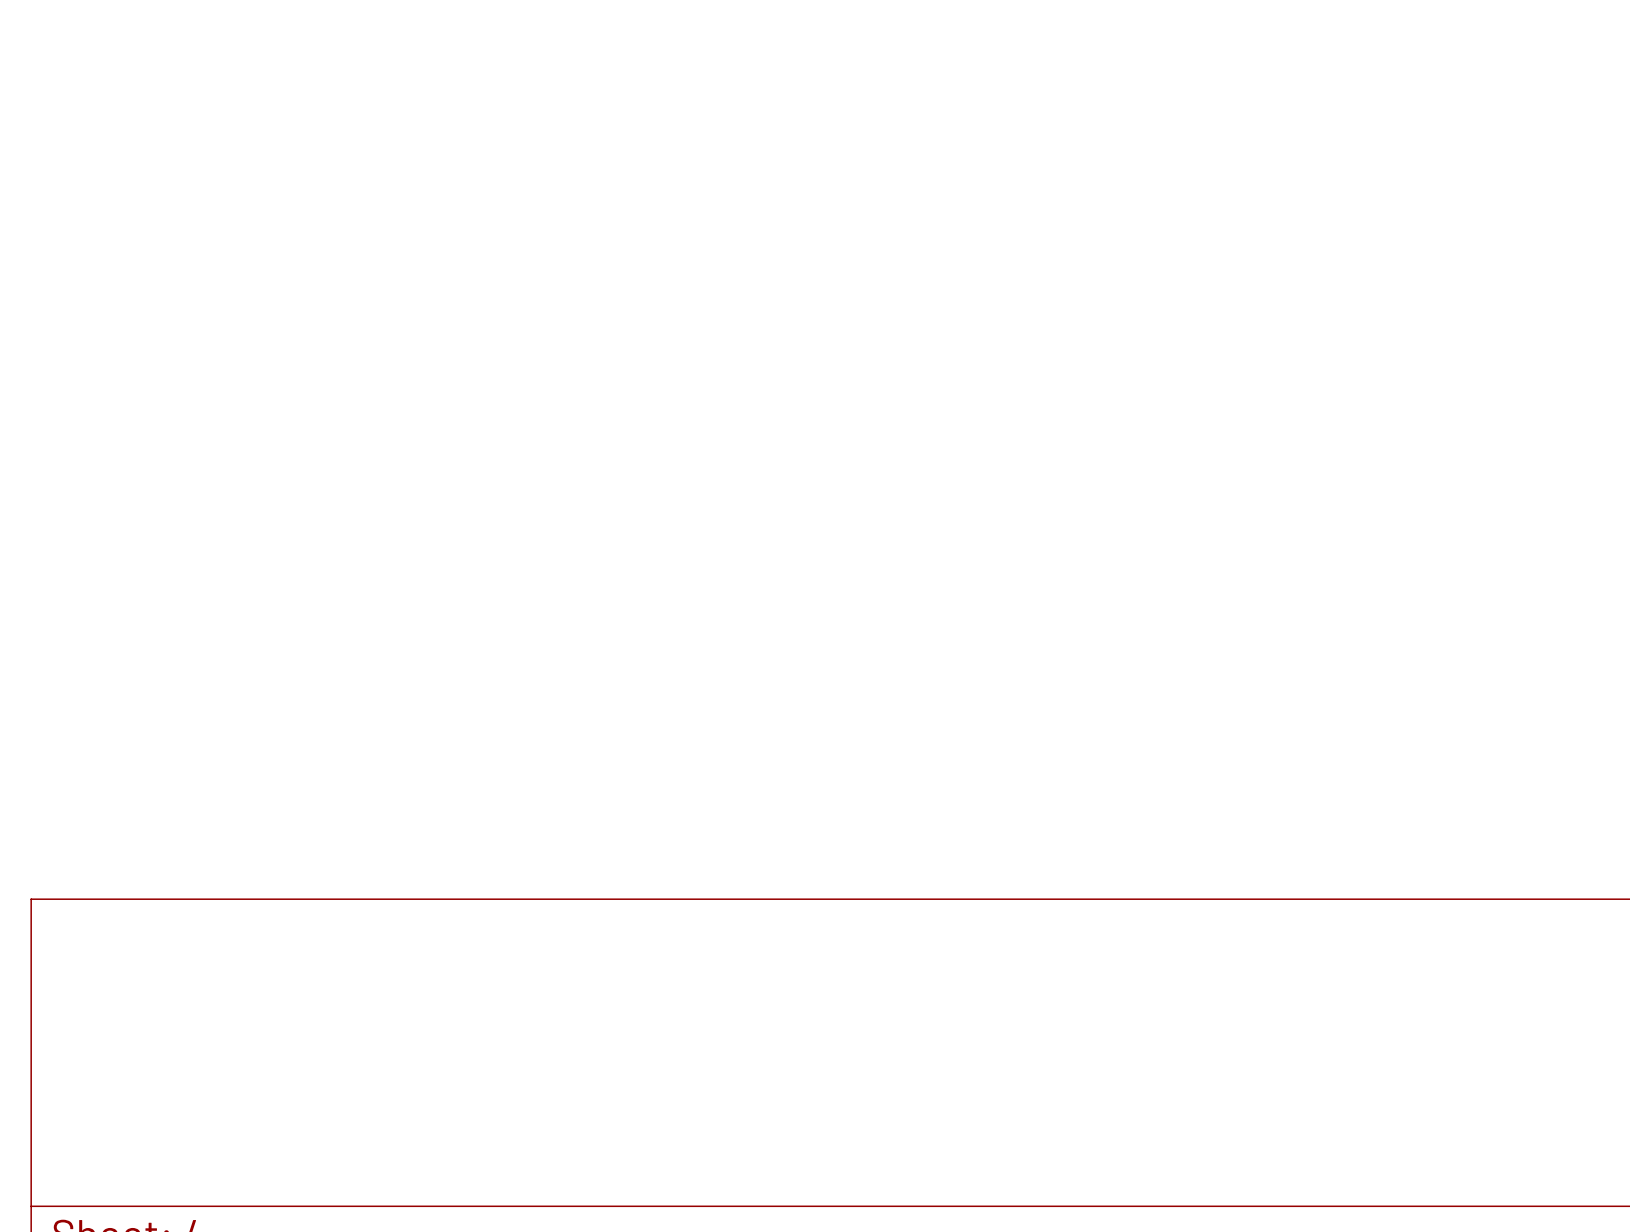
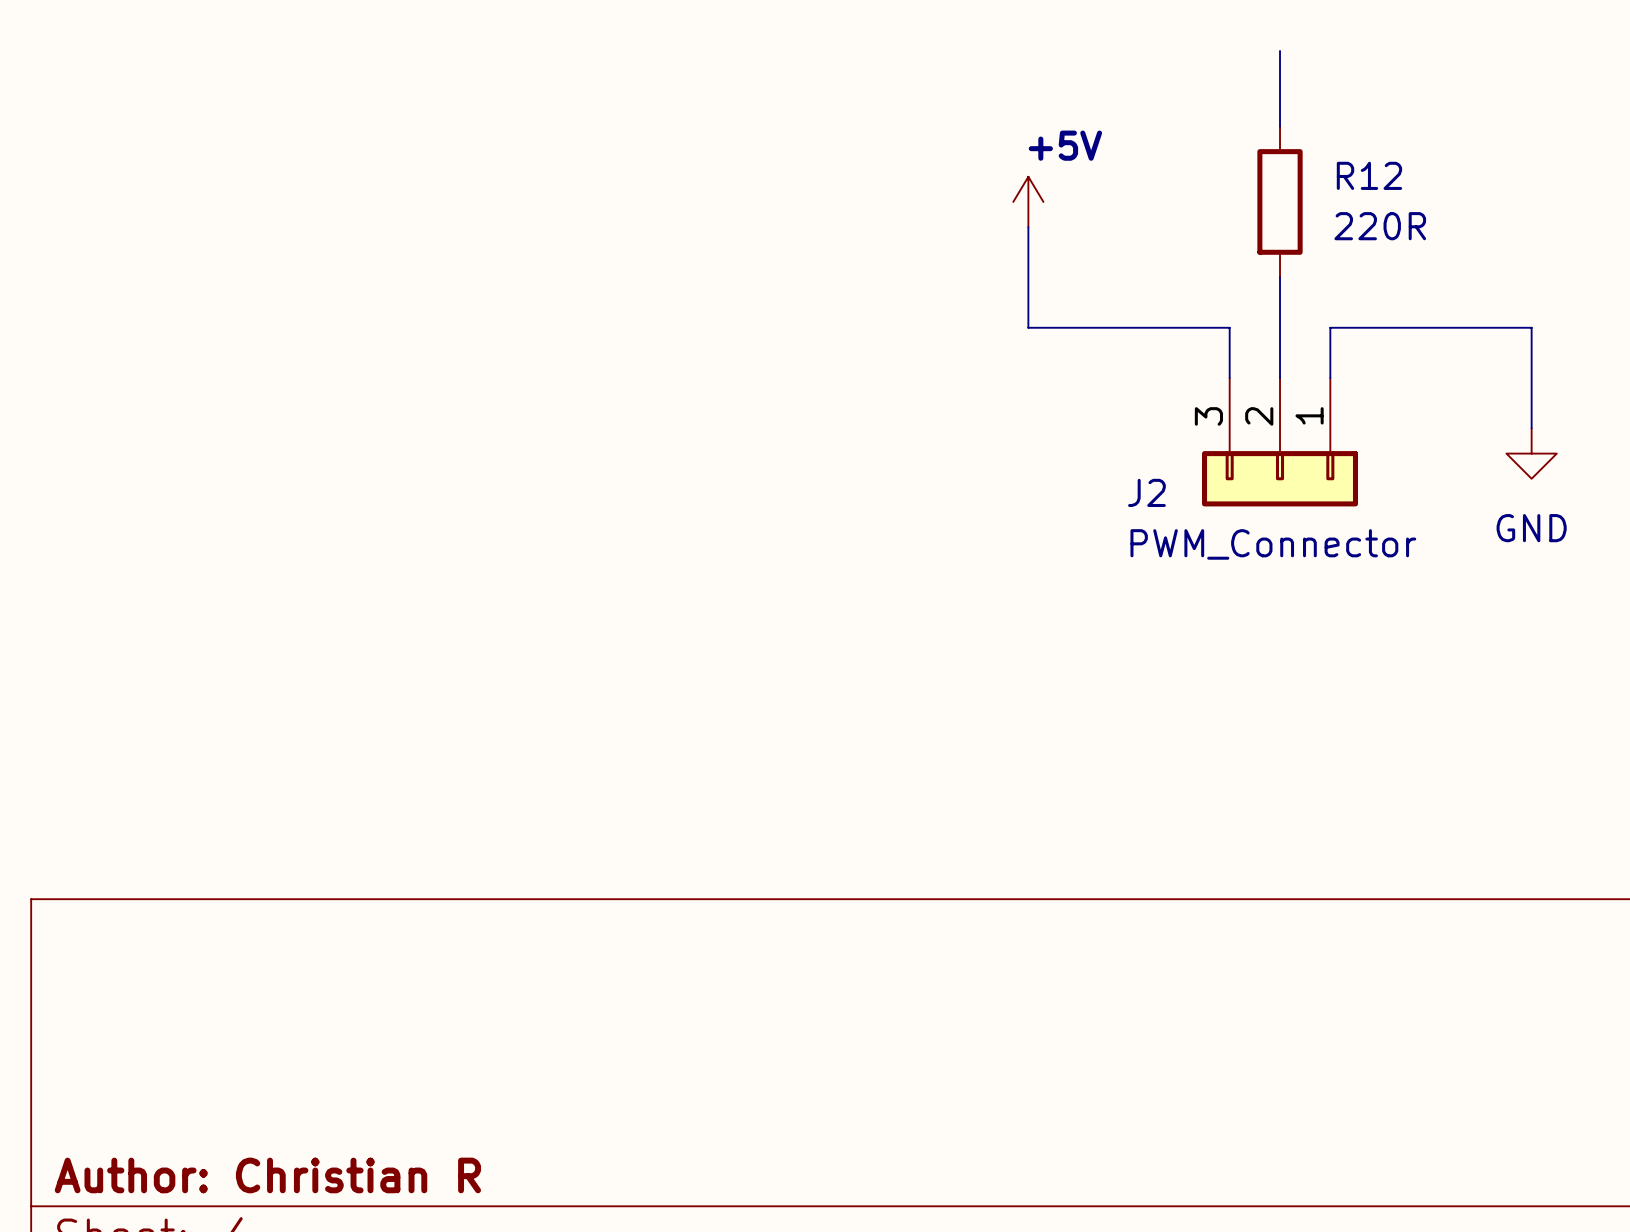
wire: none -> (1280, 50) (1280, 126)
power symbol: none -> +5V (1028, 201)
R12: none -> 220R (1280, 201)
wire: none -> (1028, 227) (1028, 327) (1229, 327) (1229, 378)
wire: none -> (1280, 277) (1280, 378)
wire: none -> (1330, 378) (1330, 327) (1531, 327) (1531, 428)
J2: none -> PWM_Connector (1280, 442)
power symbol: none -> GND (1531, 453)
title block: none -> Author: Christian R (267, 1175)

